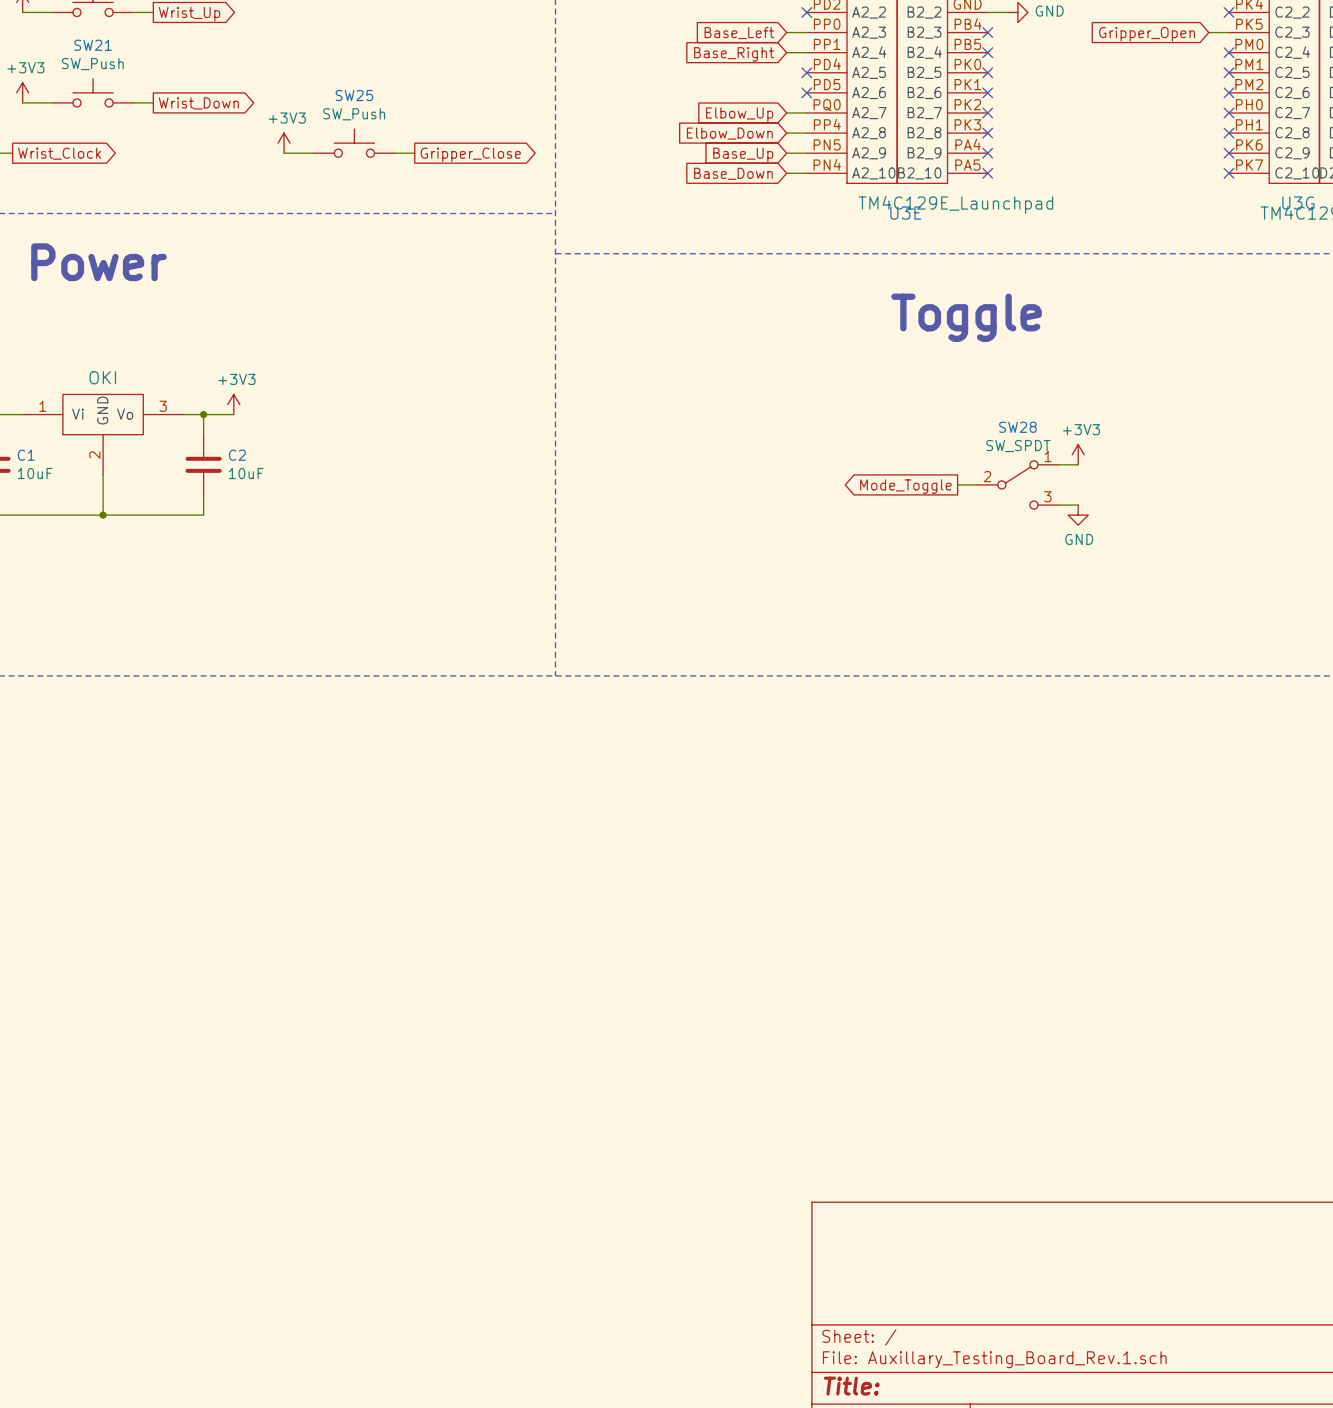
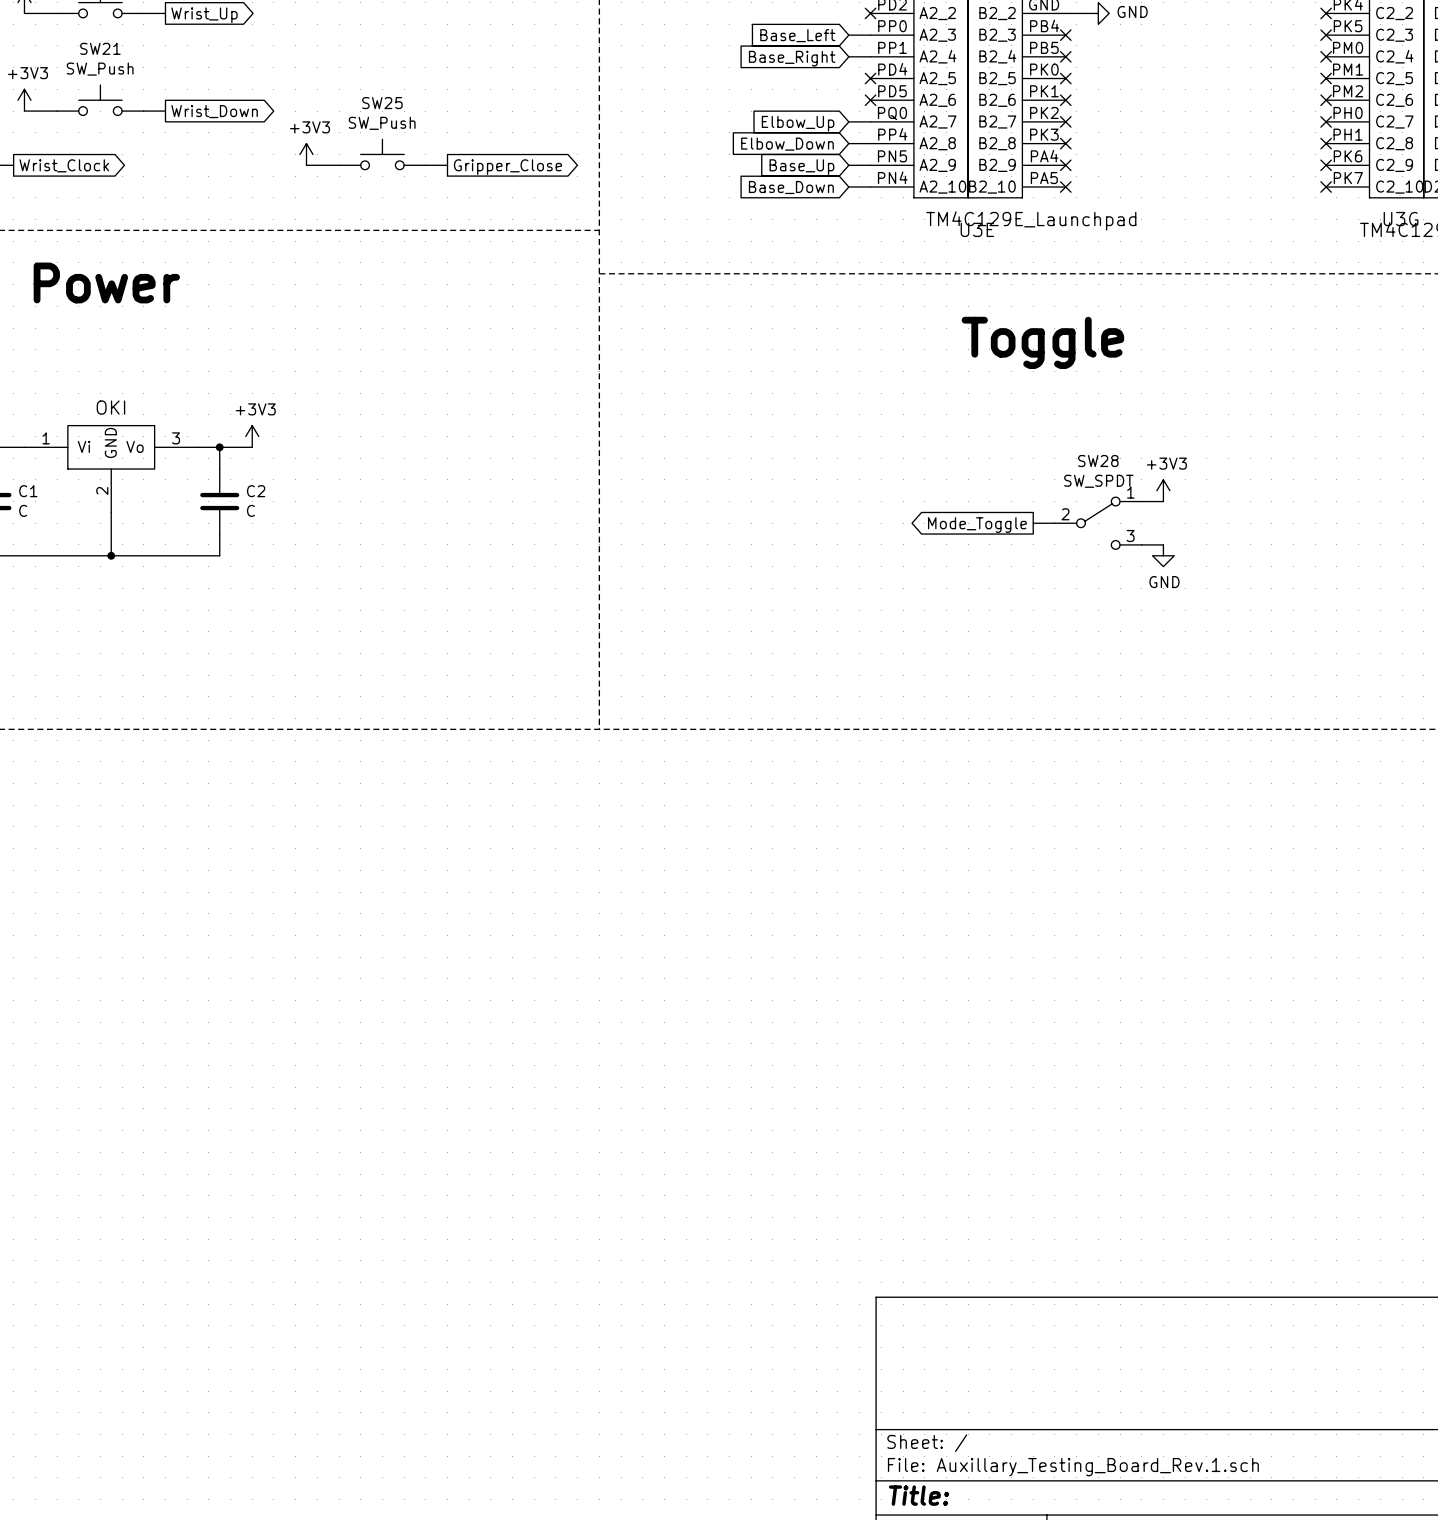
wire: (1208, 32) (1229, 32) -> none
no-connect mark: none -> (1326, 35)
global label: Gripper_Open (1147, 34) -> none
C1 value: 10uF (35, 473) -> C (23, 510)
C2 value: 10uF (246, 473) -> C (250, 510)

